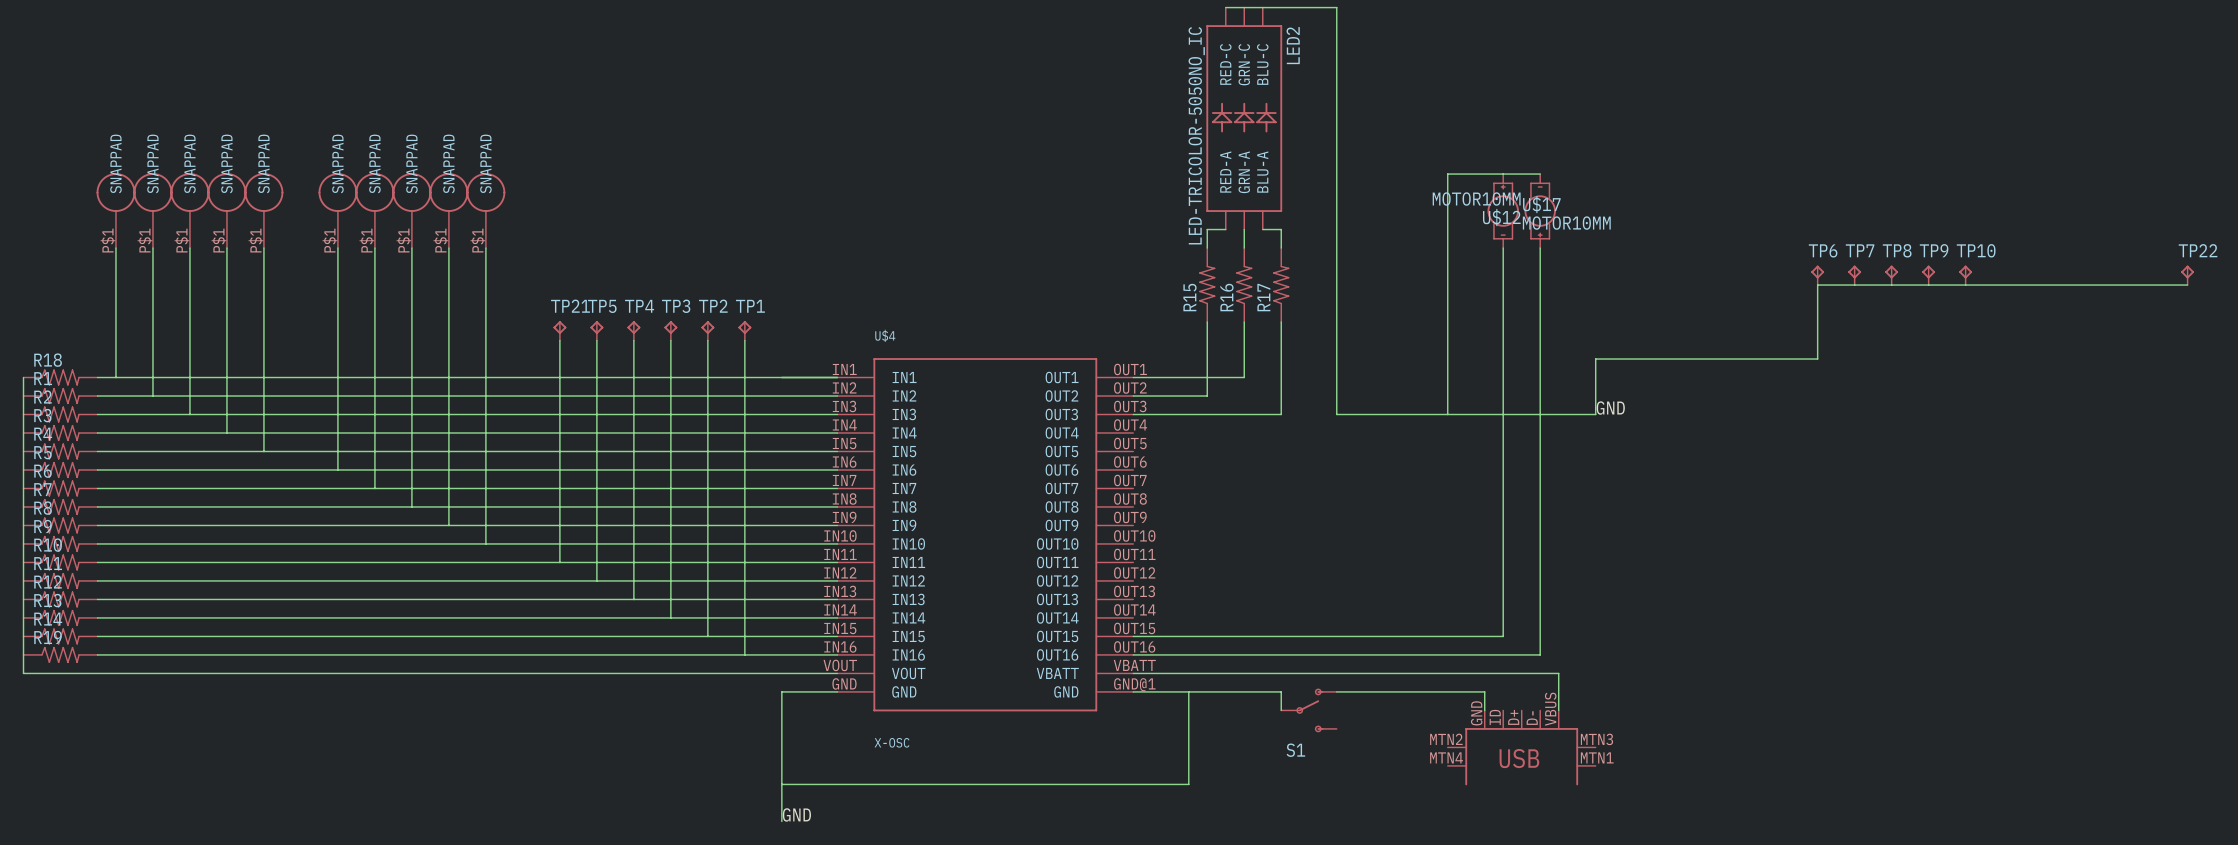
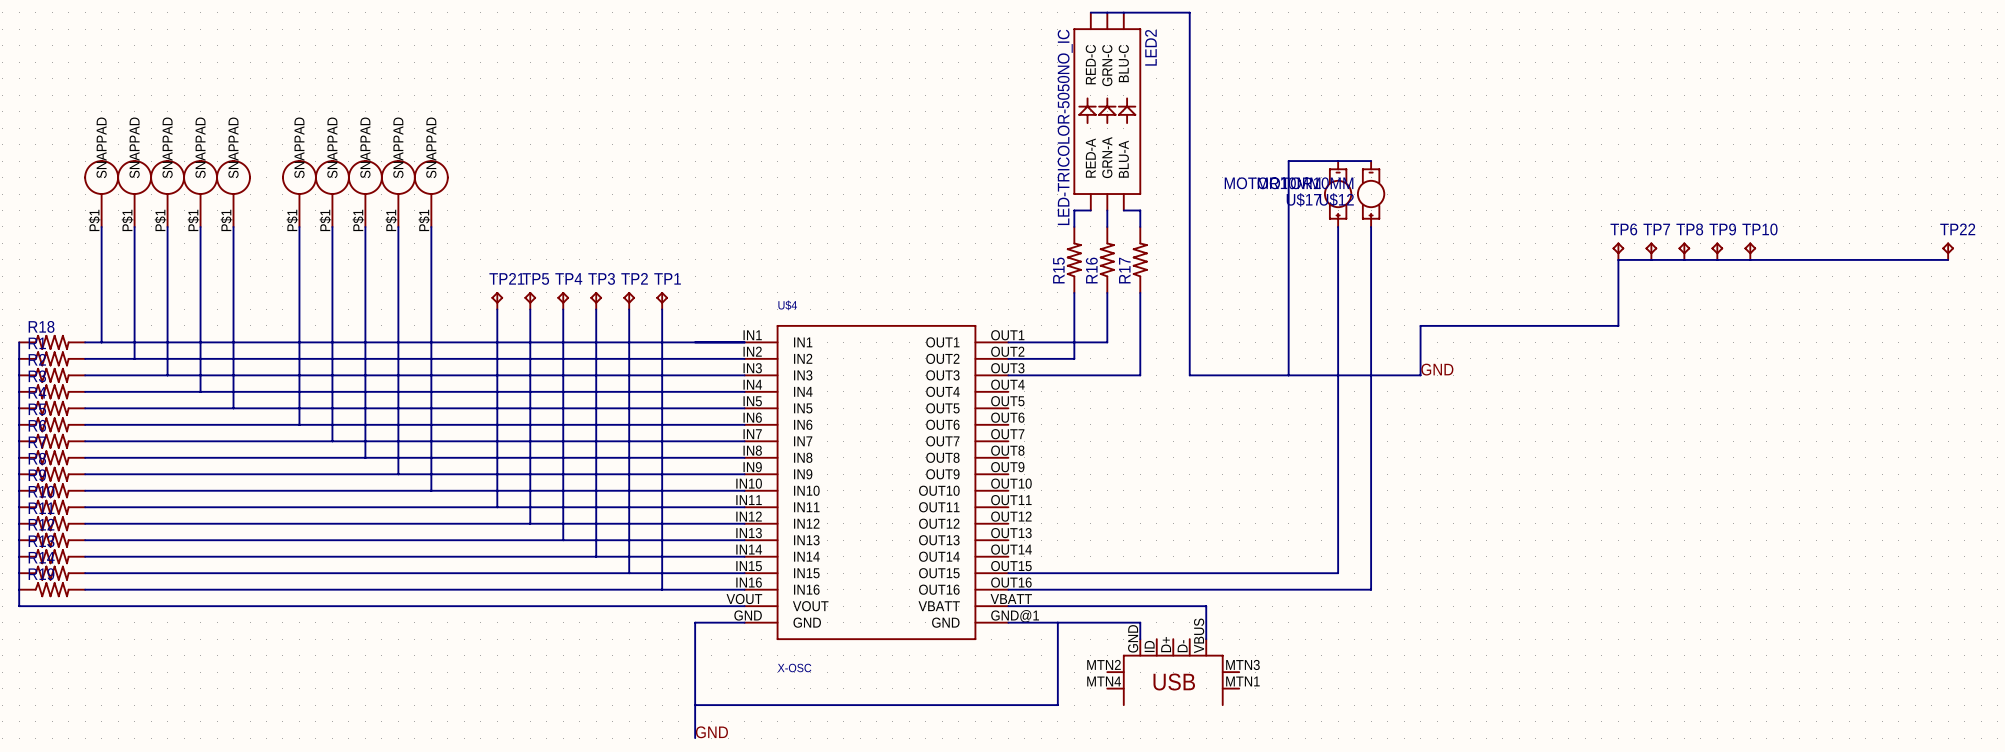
U$17 rotation: 0° (1503, 211) -> 180° (1338, 194)
wire: (1355, 673) (1558, 673) (1558, 710) -> (1206, 606) (1206, 639)
wire: (1336, 691) (1484, 691) (1484, 710) -> none
S1: (1309, 710) -> none
part: none -> (1173, 672)
part: (1521, 747) -> none

